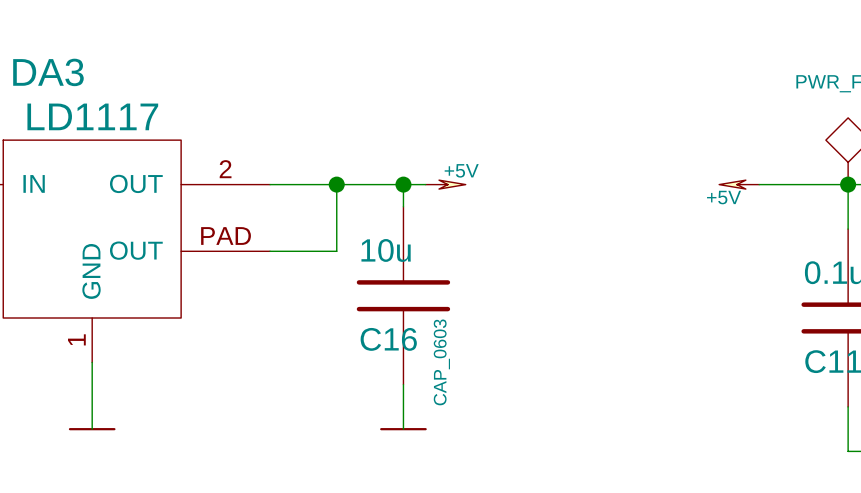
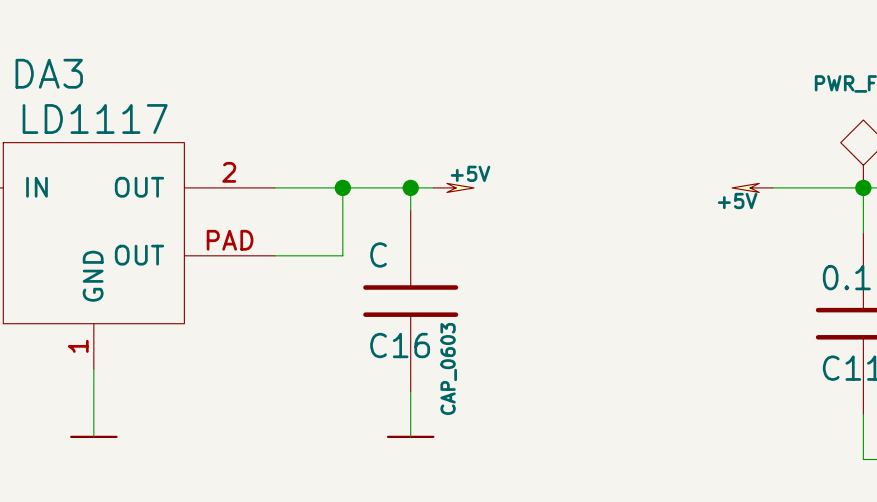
C16 value: 10u (386, 250) -> C (378, 254)

